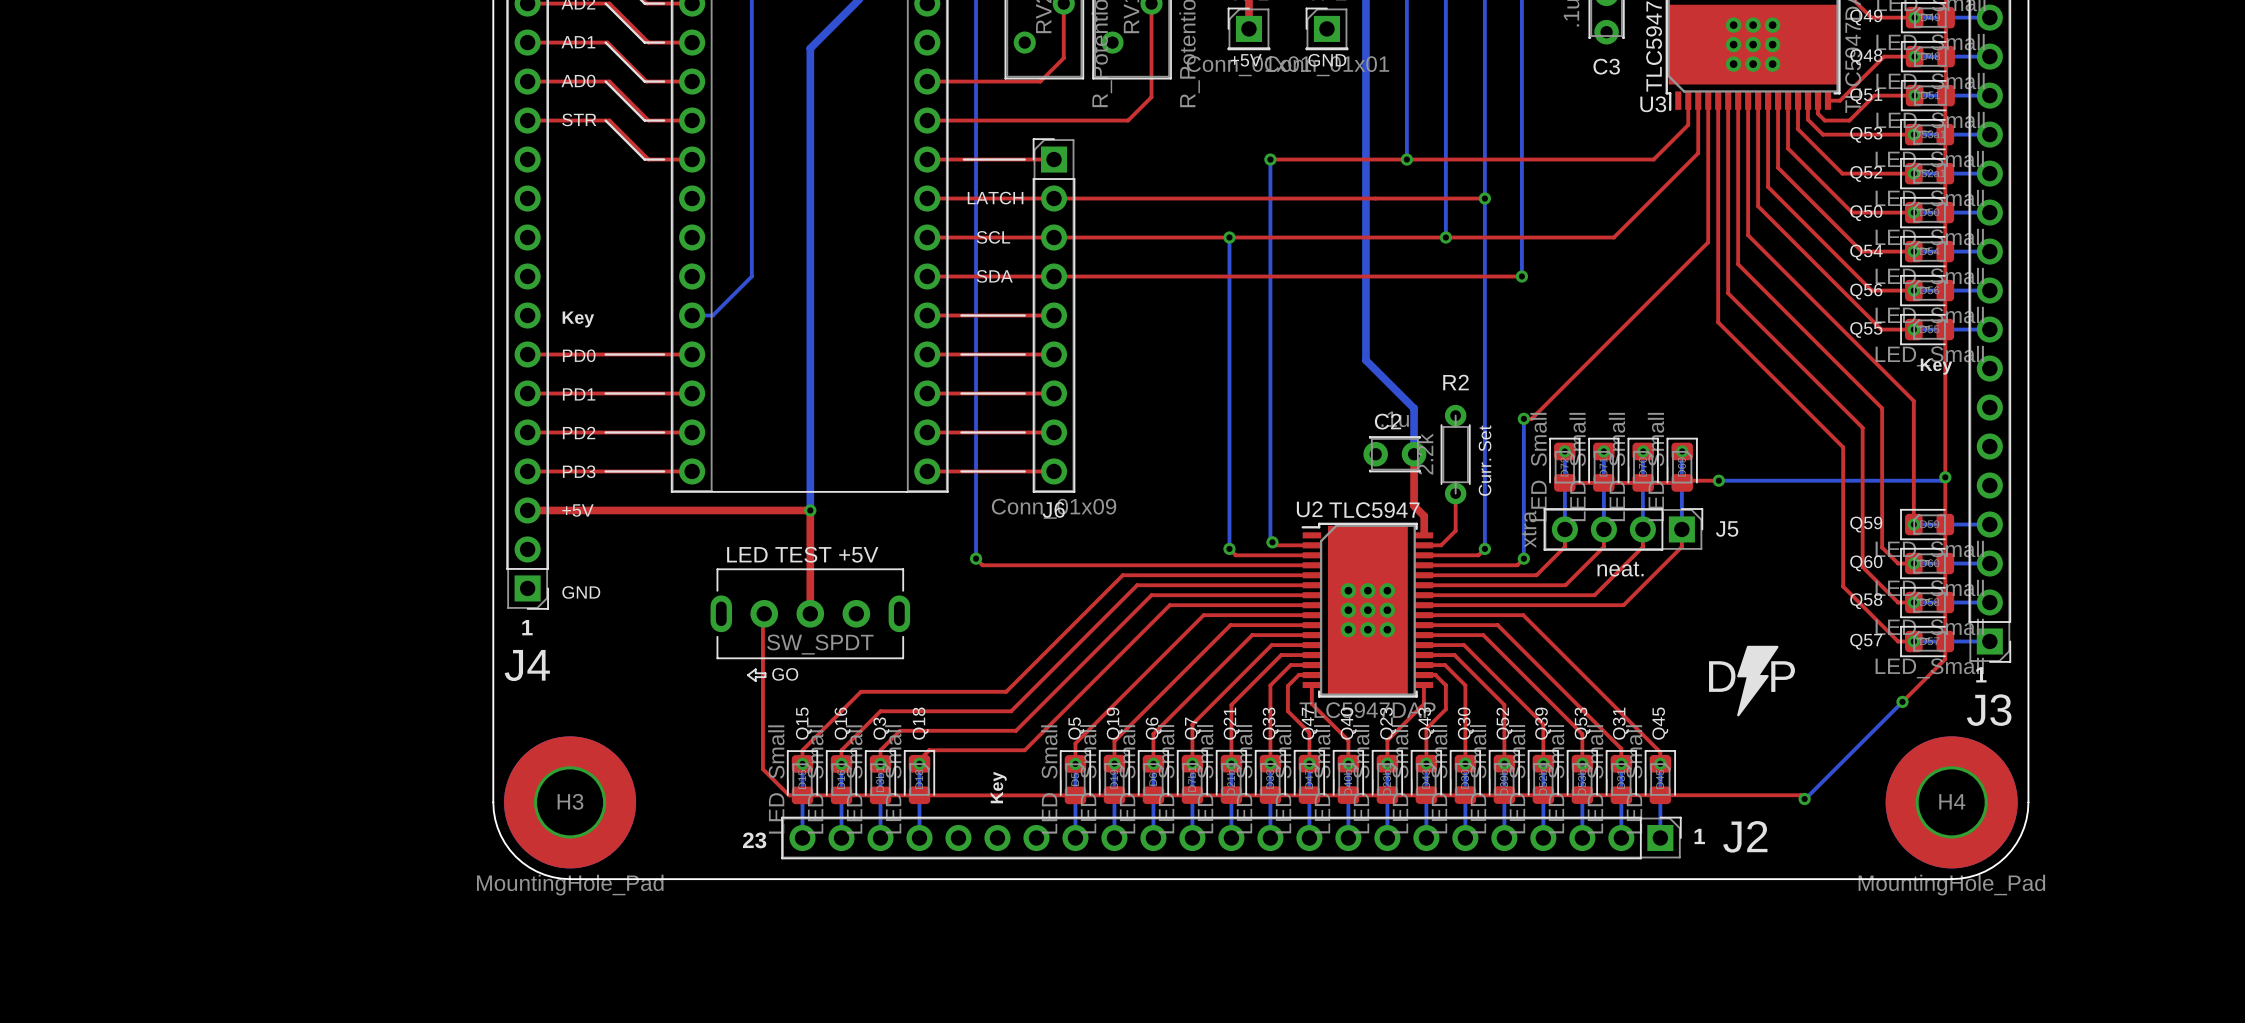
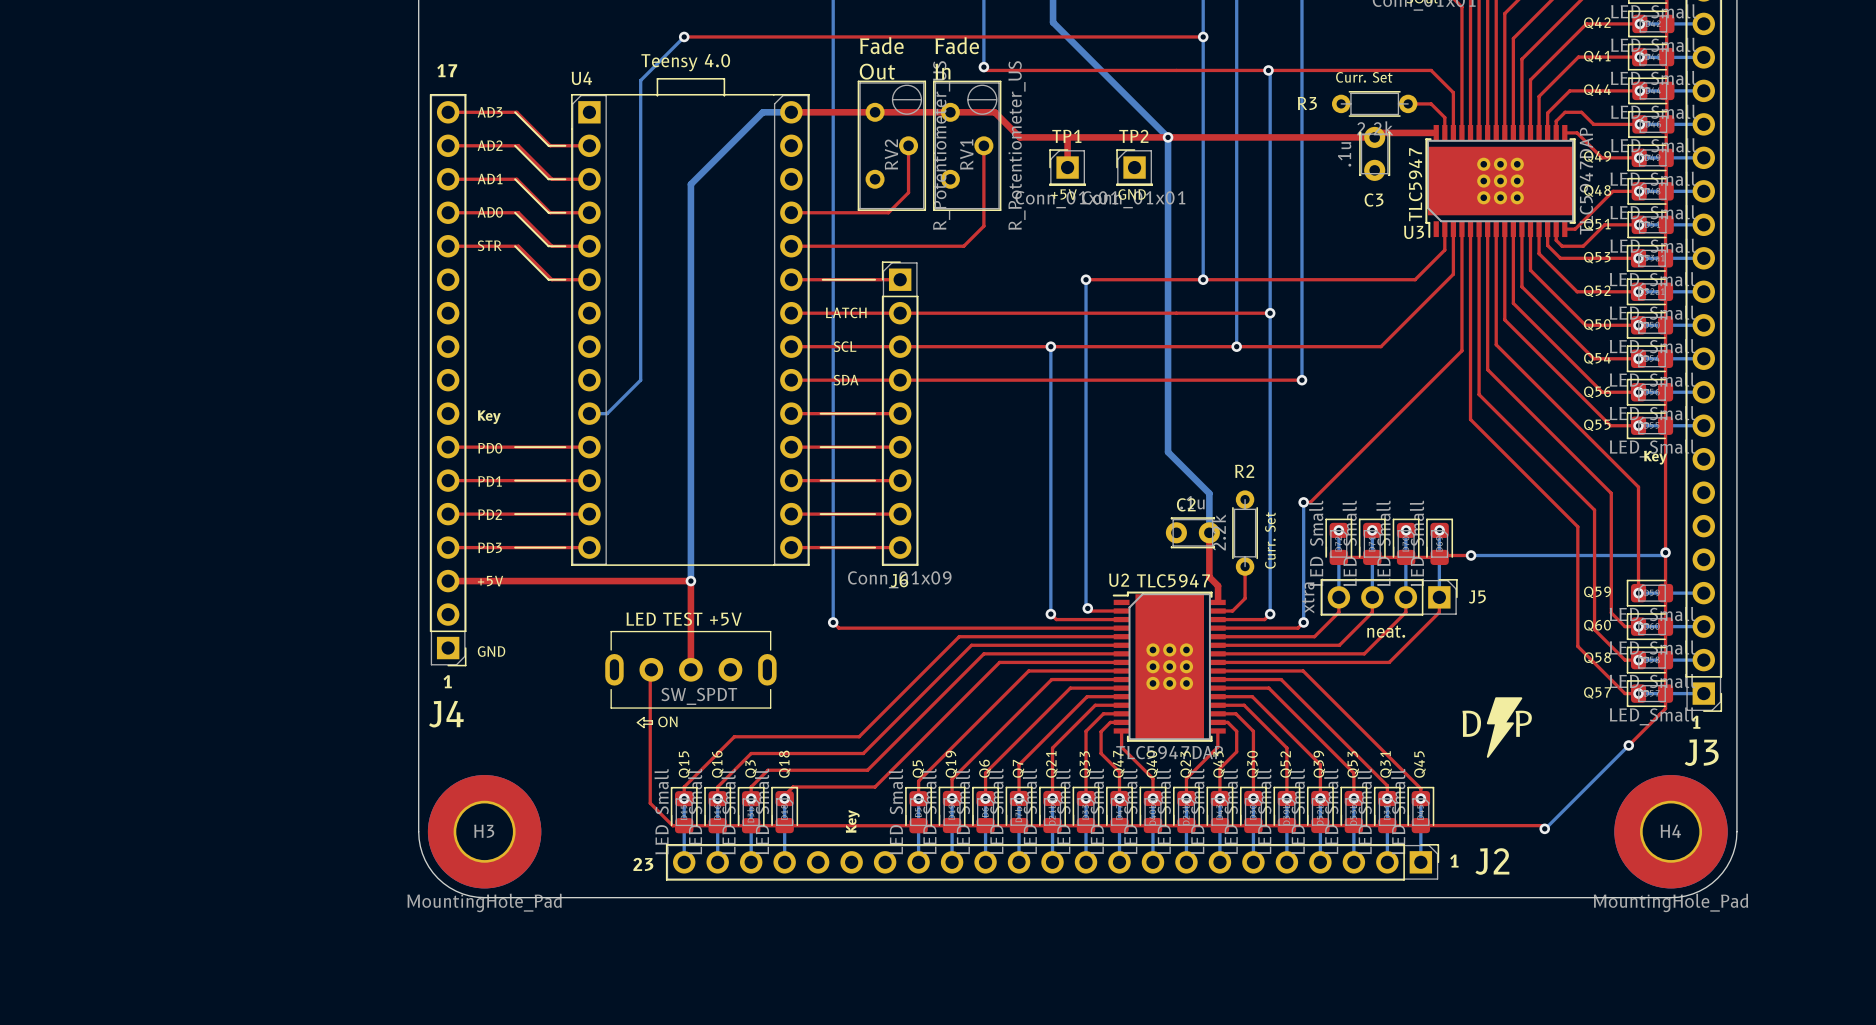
text: GO (785, 674) -> ON (667, 721)

